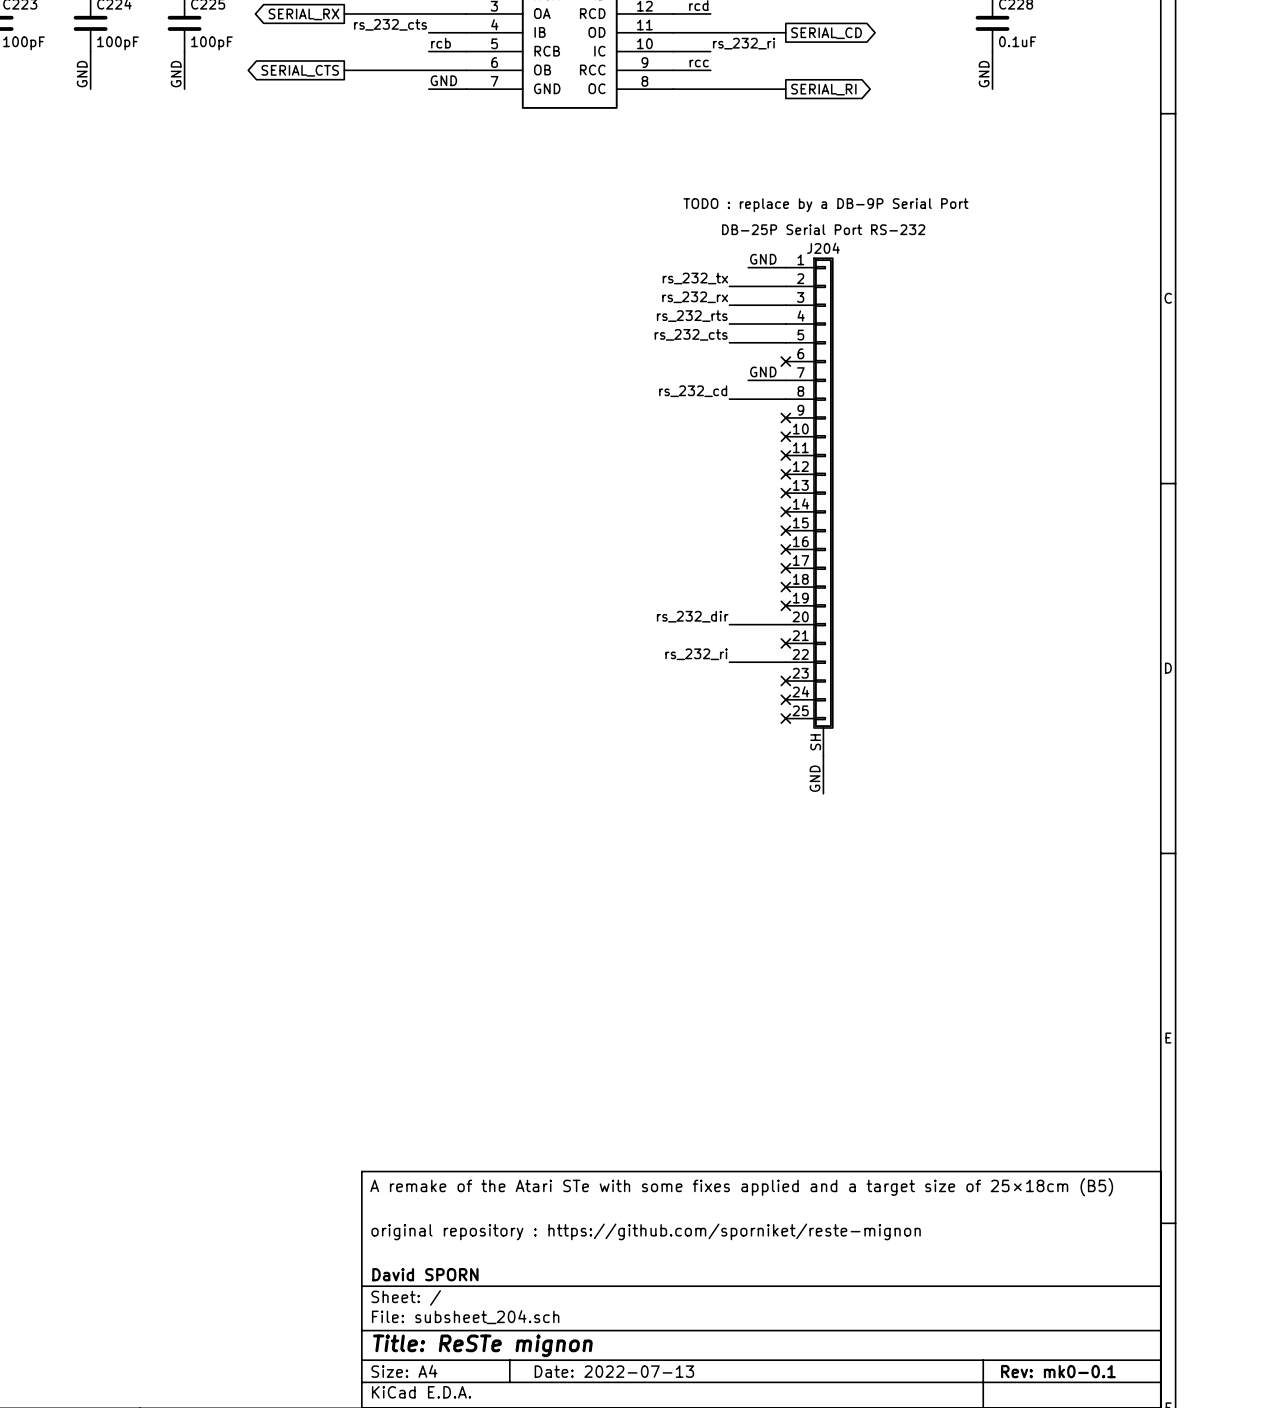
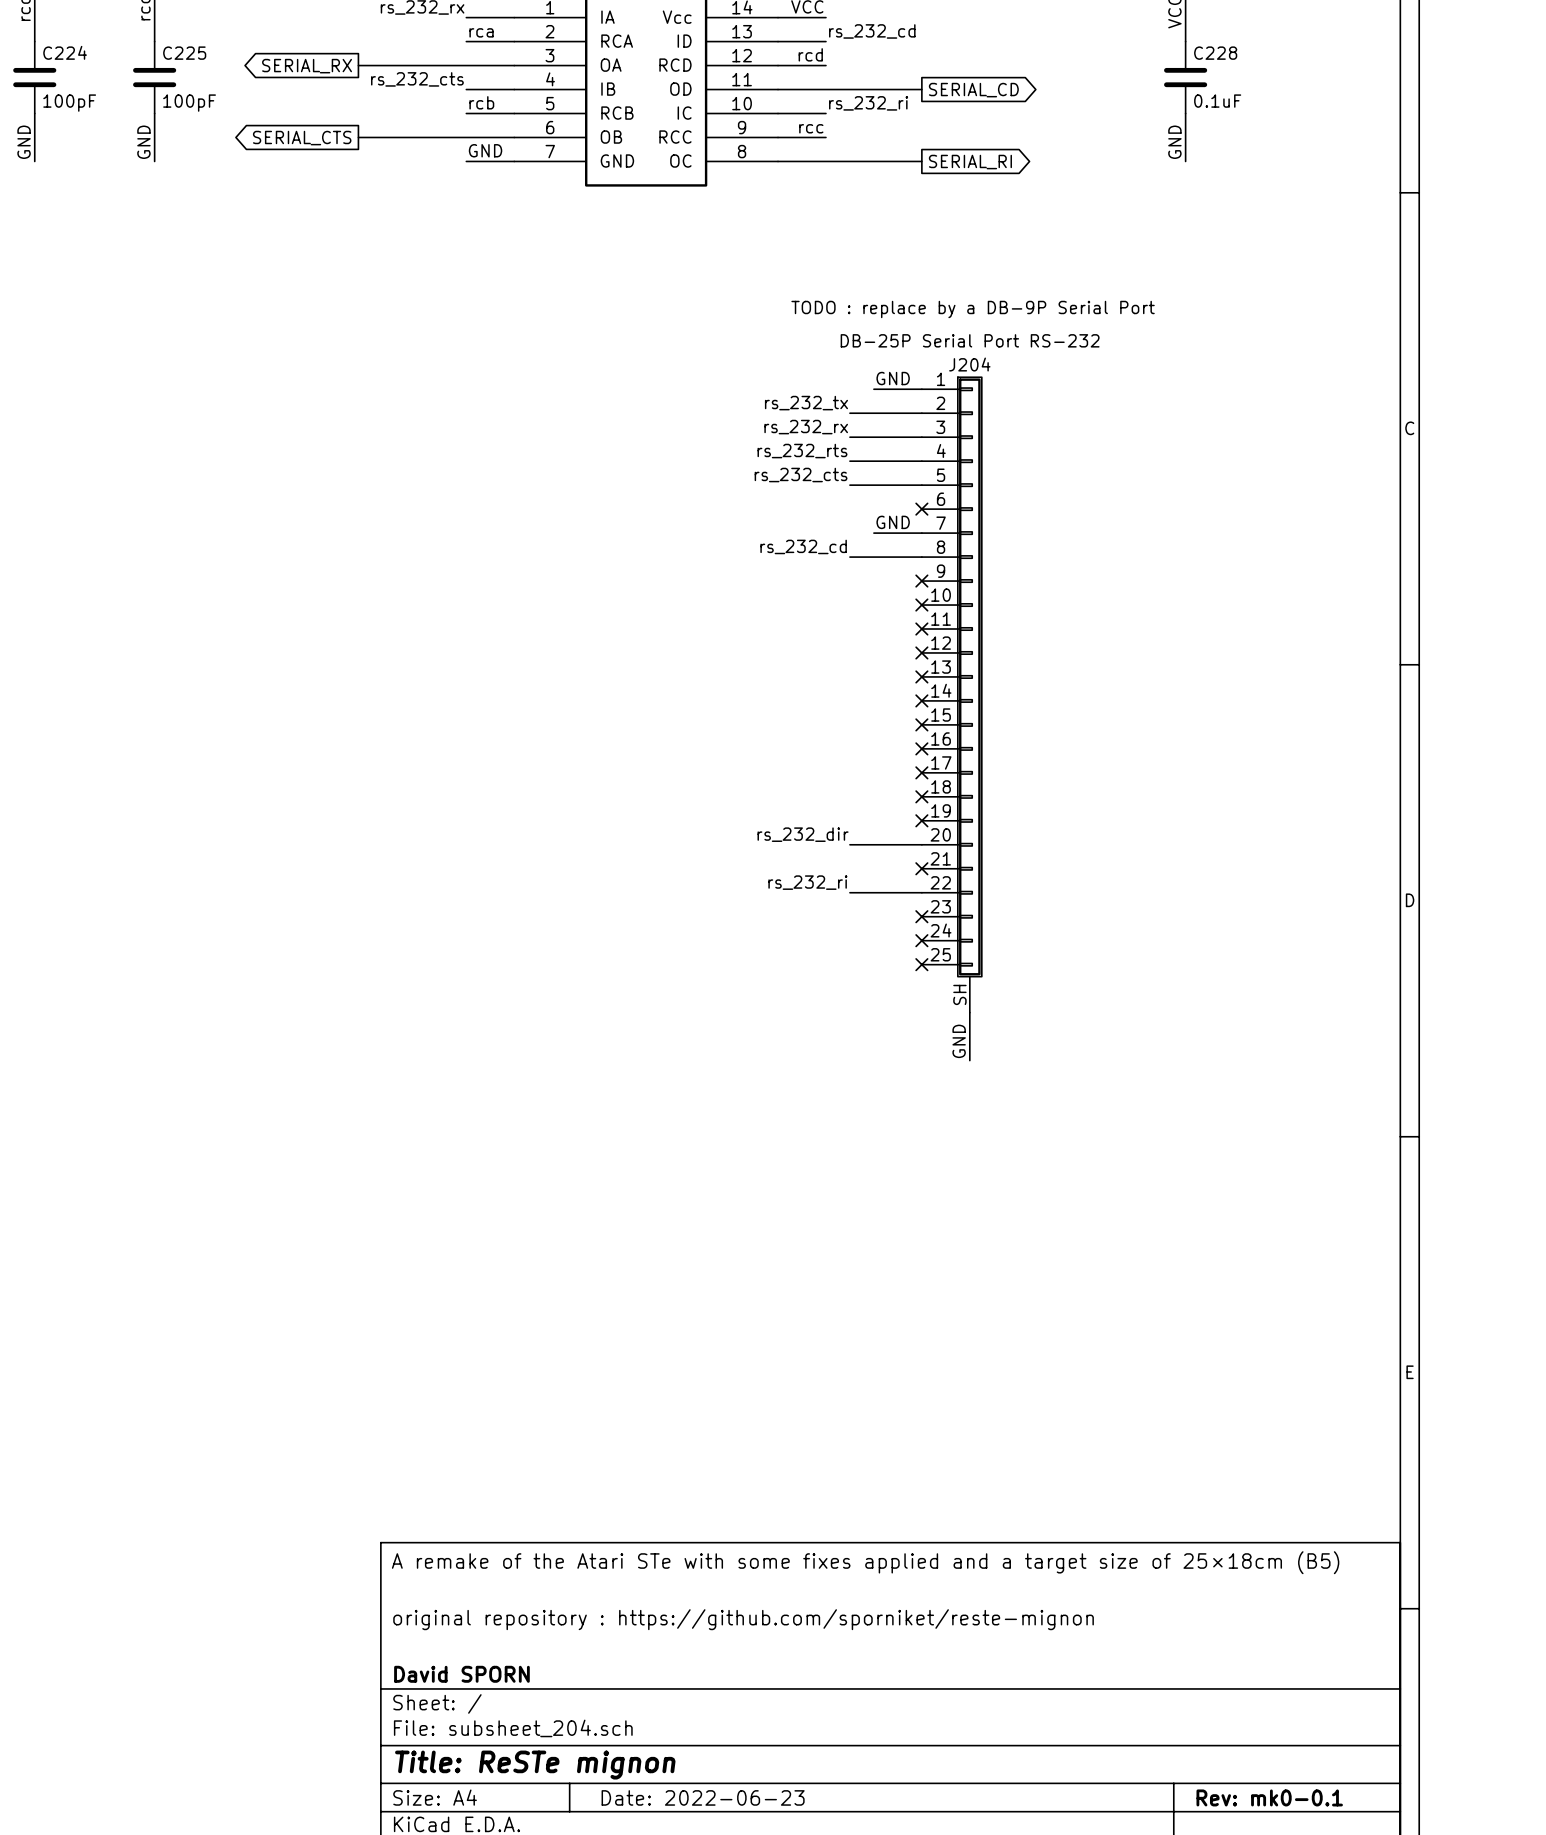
title block: Date: 2022-07-13 (614, 1371) -> Date: 2022-06-23 (703, 1797)

